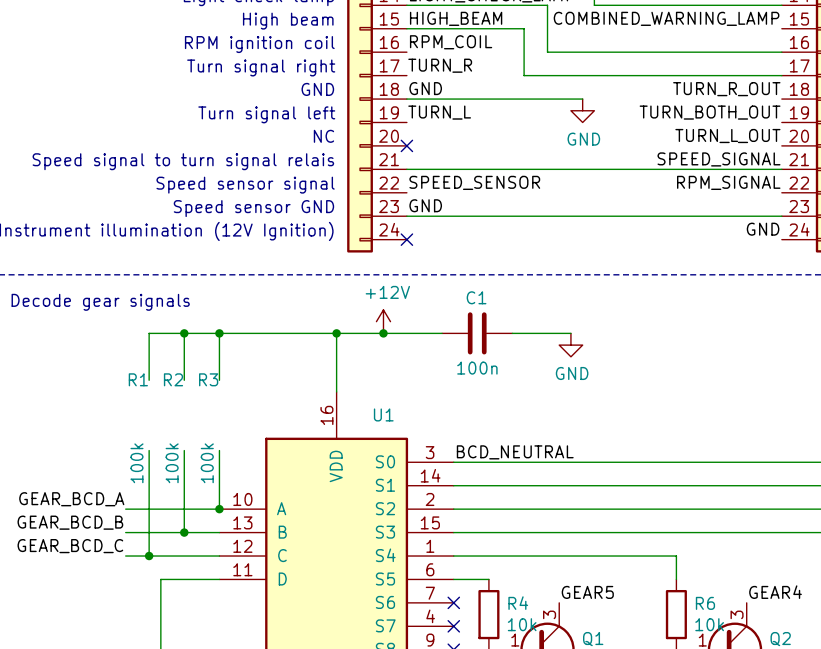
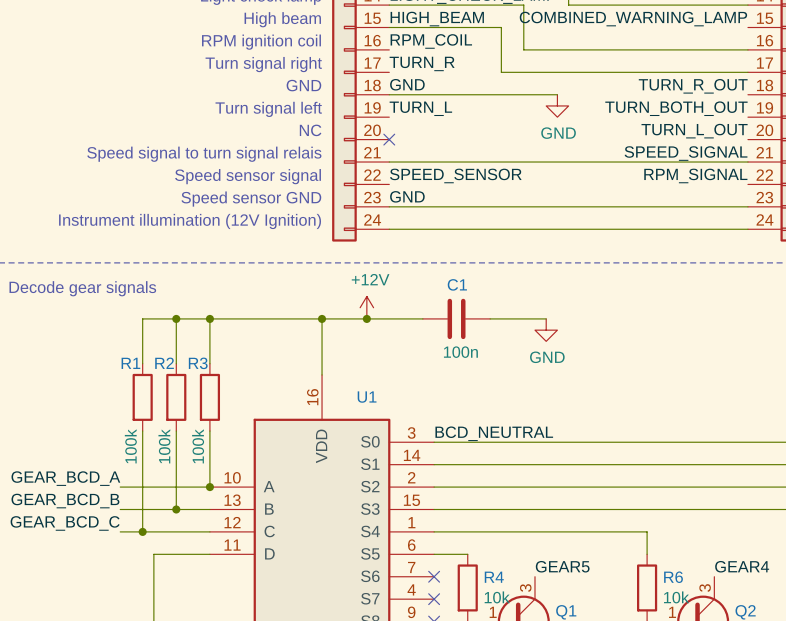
label: GND (763, 229) -> none
wire: none -> (389, 229) (747, 229)
no-connect mark: (406, 239) -> none
R1 symbol: [128, 373, 148, 484] -> [132, 363, 153, 432]
R2 symbol: [163, 373, 184, 484] -> [166, 363, 187, 432]
R3 symbol: [199, 373, 219, 484] -> [199, 363, 221, 432]

